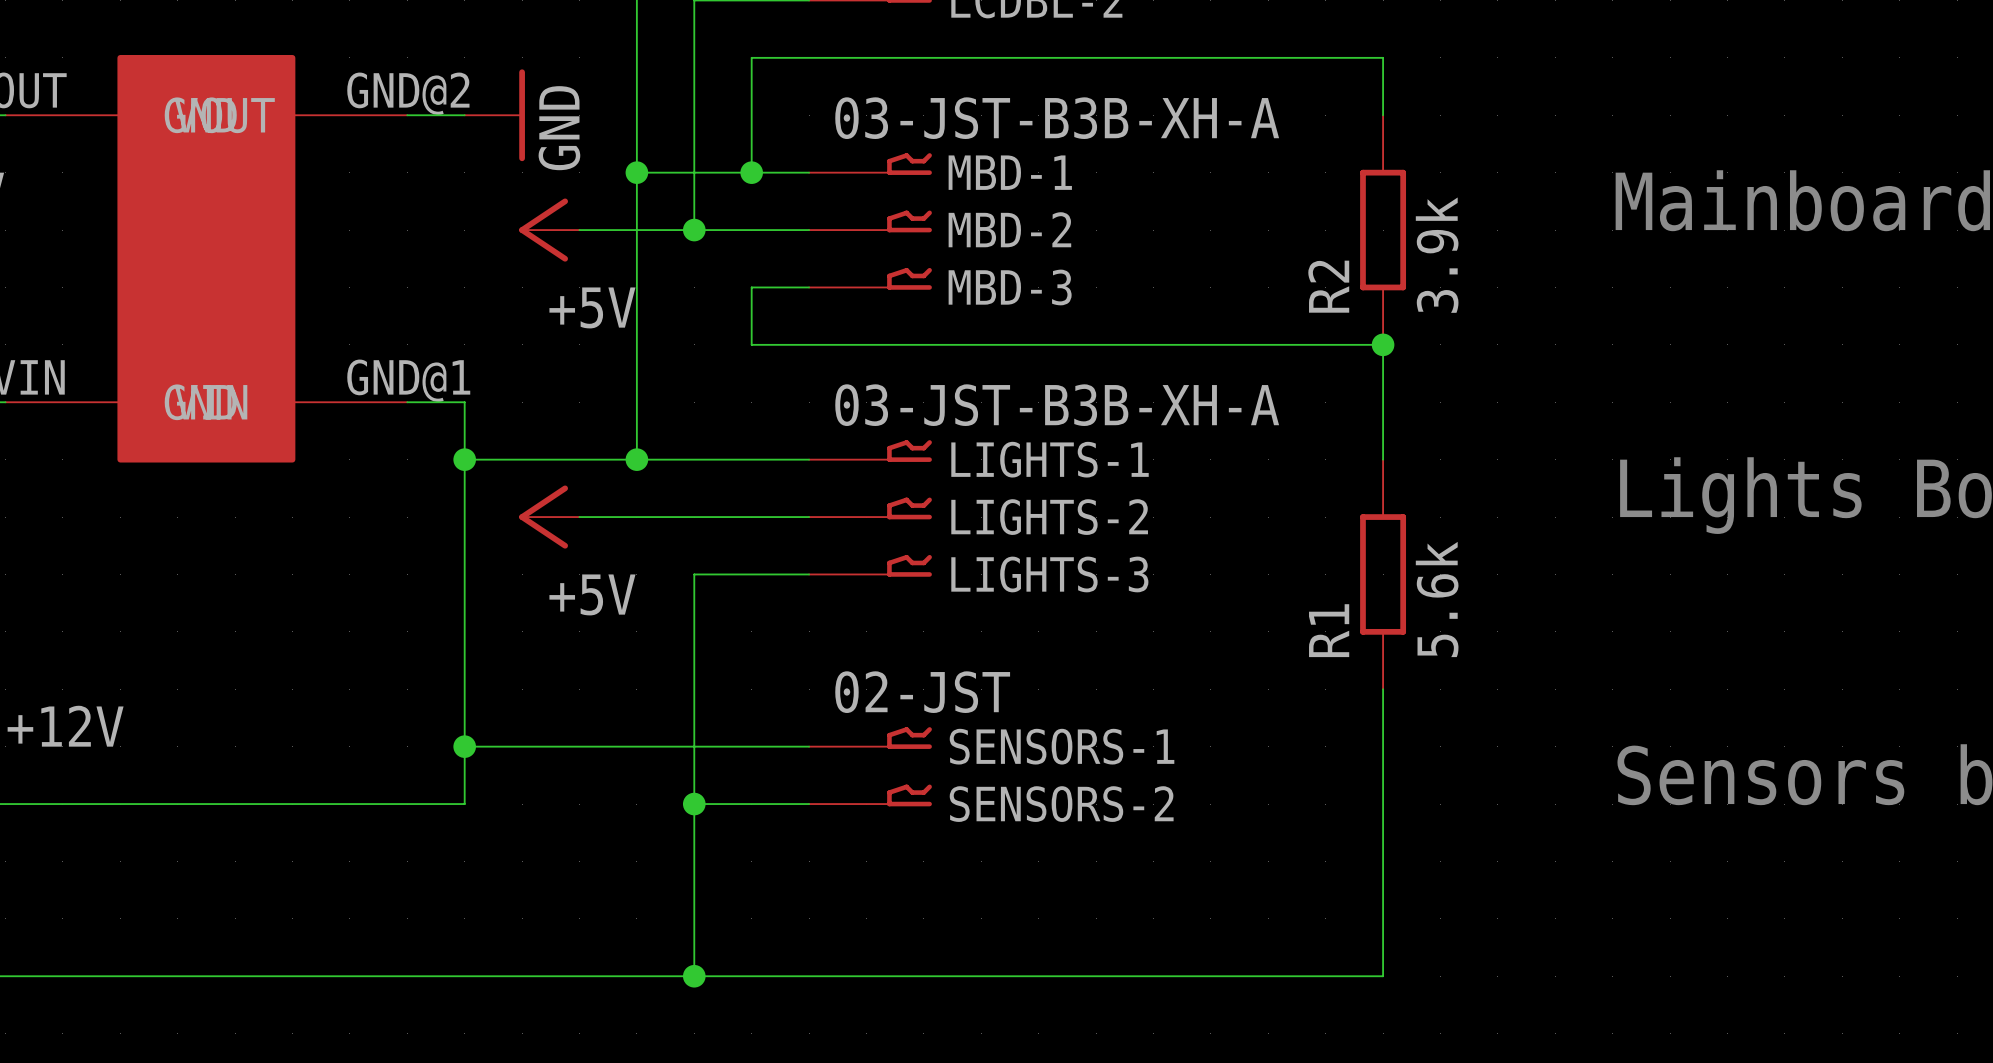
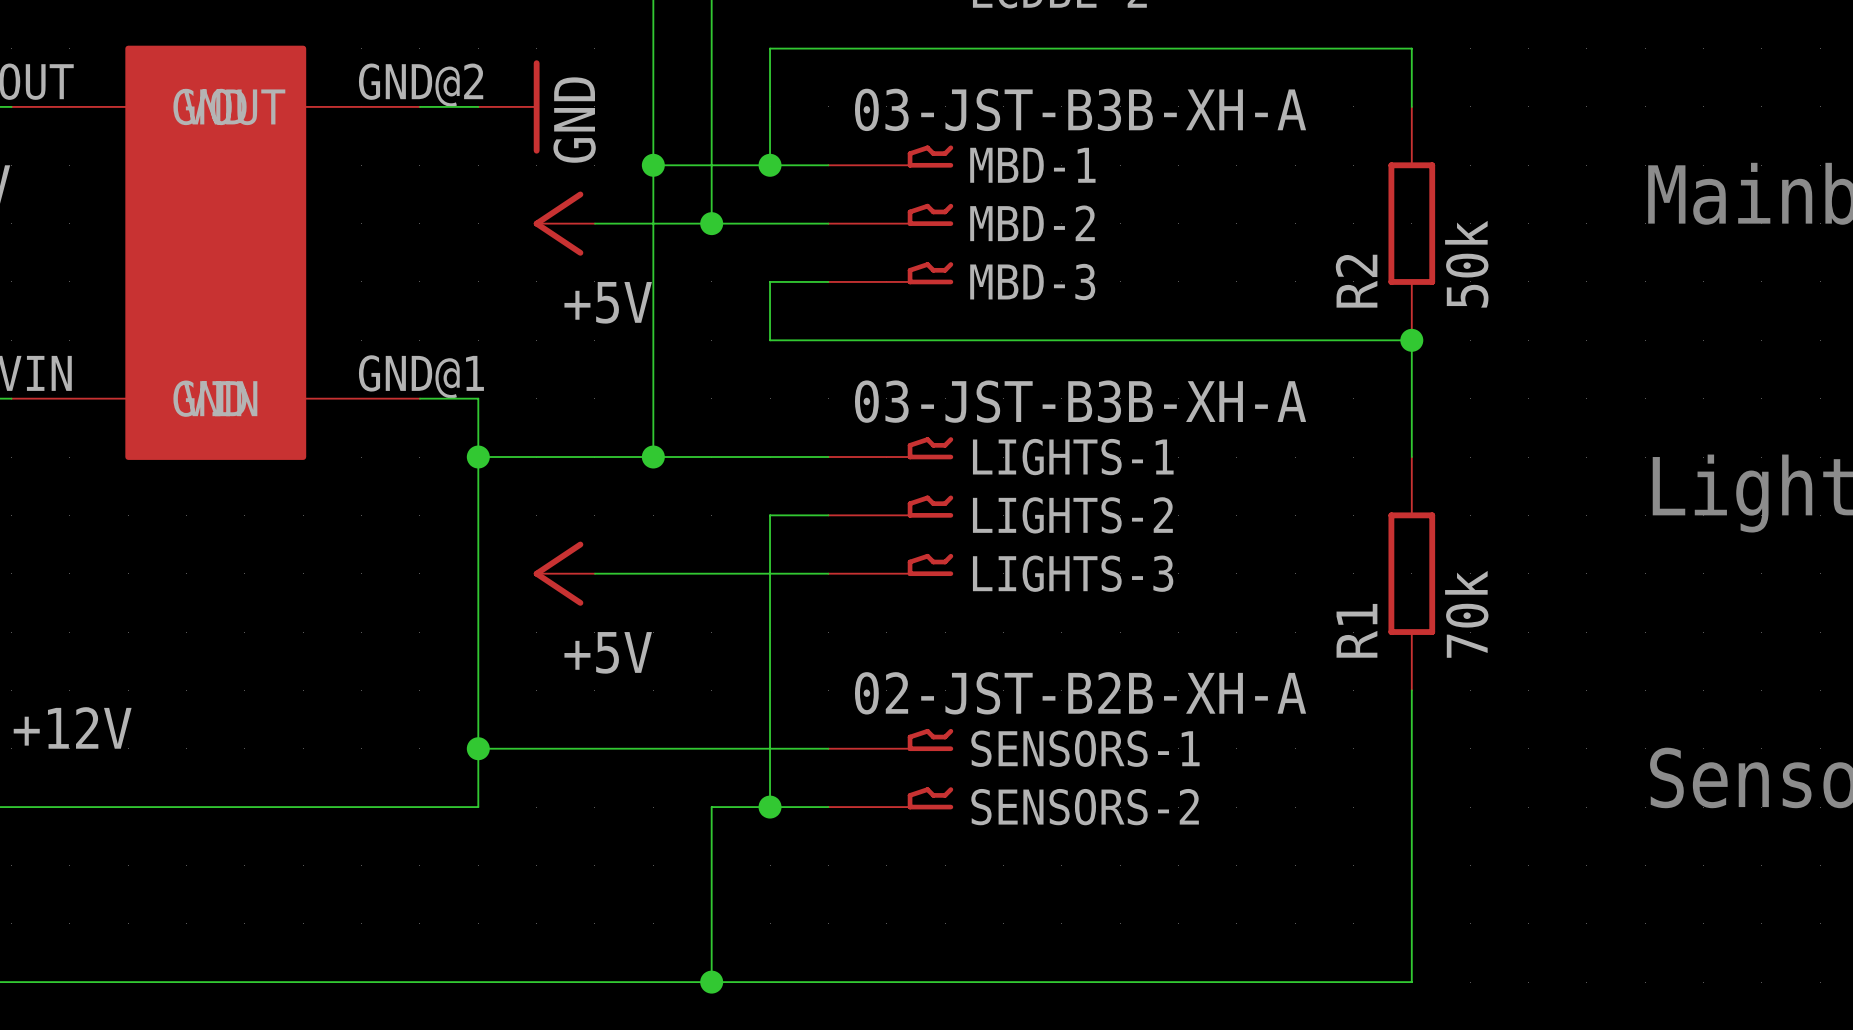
R2 value: 3.9k (1437, 255) -> 50k (1466, 264)
power symbol position: +5V (549, 517) -> +5V (564, 573)
wire: (579, 517) (751, 517) -> (770, 807) (770, 515)
wire: (694, 574) (694, 804) -> (711, 573) (594, 573)
R1 value: 5.6k (1437, 599) -> 70k (1466, 614)
SENSORS-1 value: 02-JST (922, 692) -> 02-JST-B2B-XH-A (1080, 693)
junction position: (694, 804) -> (770, 807)

